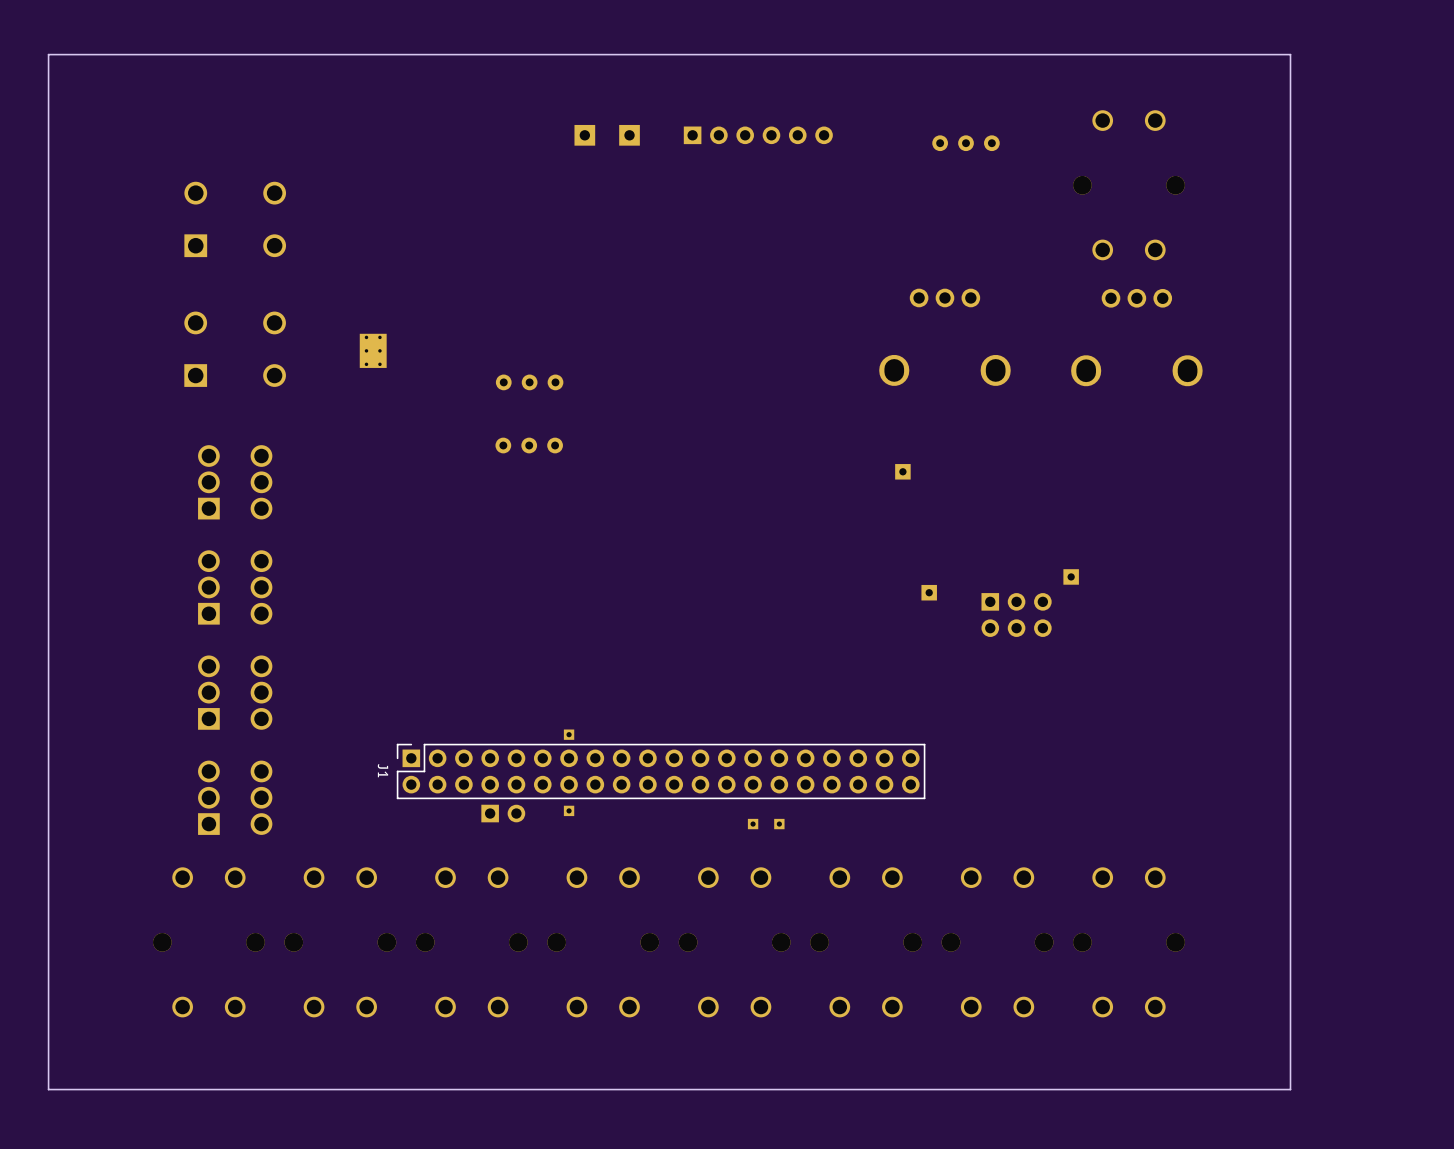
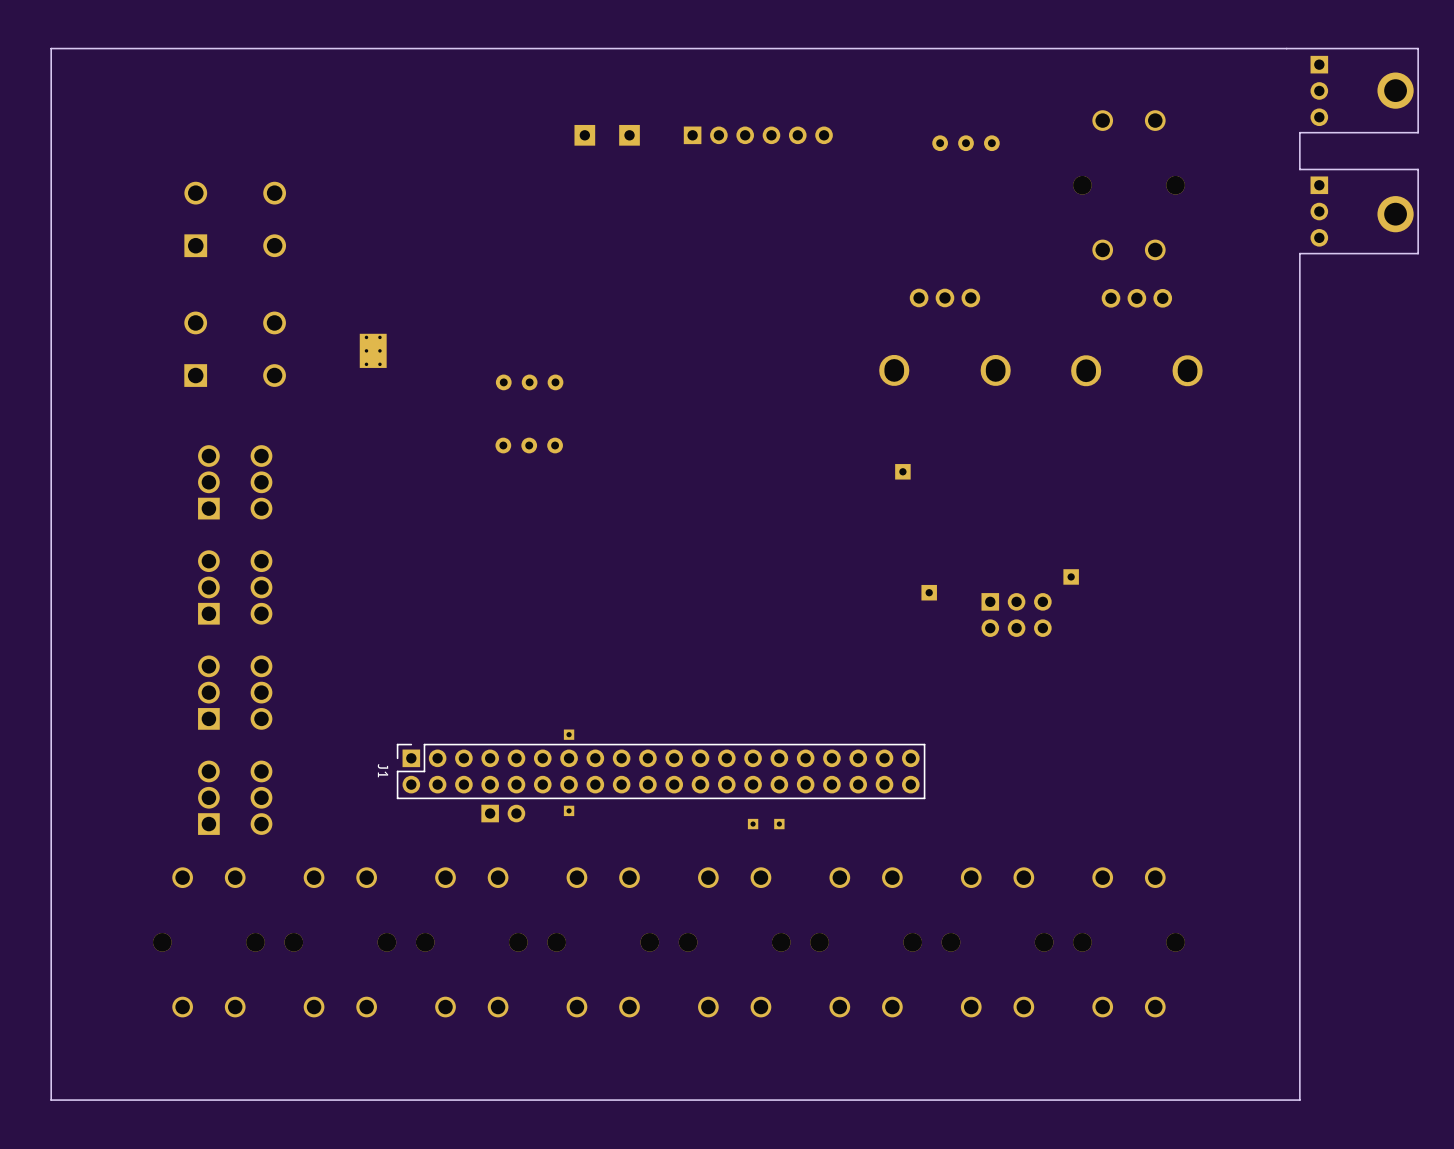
board edge: (1290, 54) (48, 54) (48, 1089) (1290, 1089) (1290, 54) -> (1418, 48) (1418, 132) (1299, 132) (1299, 169) (1418, 169) (1418, 253) (1299, 253) (1299, 1100) (51, 1100) (51, 48) (1418, 48)
part: none -> (1319, 90)
part: none -> (1395, 90)
part: none -> (1319, 211)
part: none -> (1395, 214)

